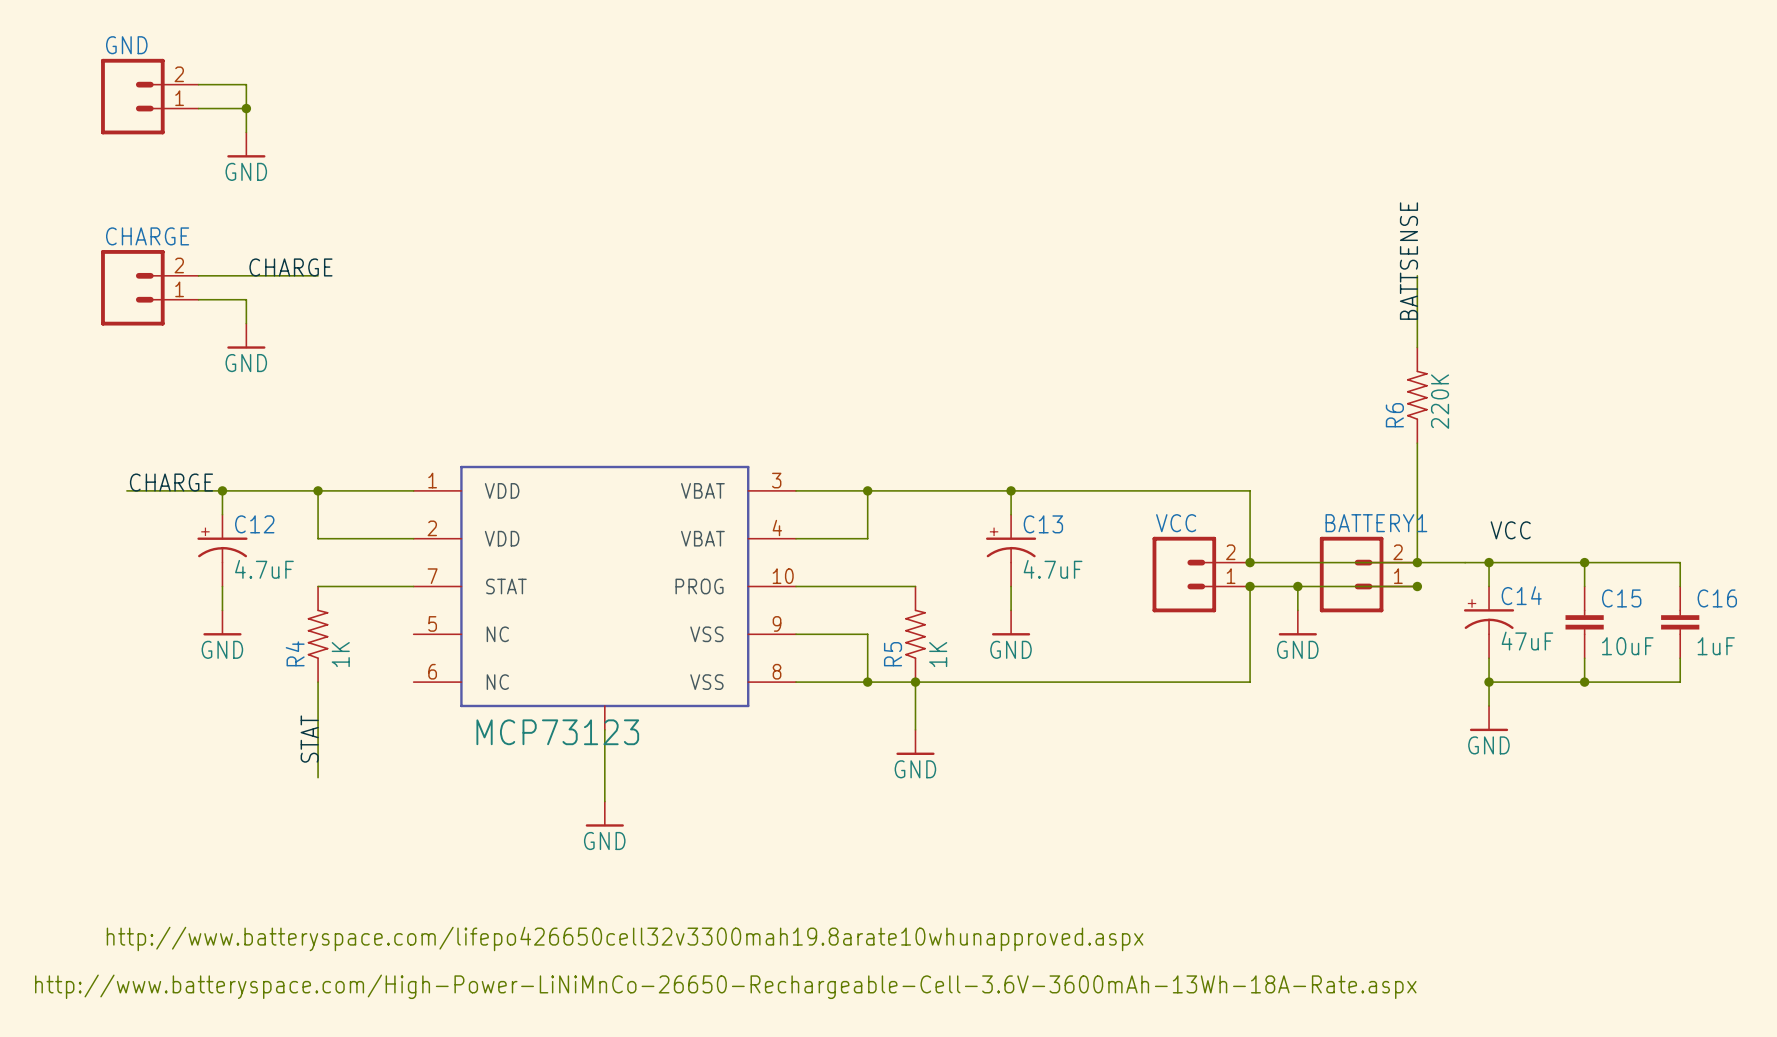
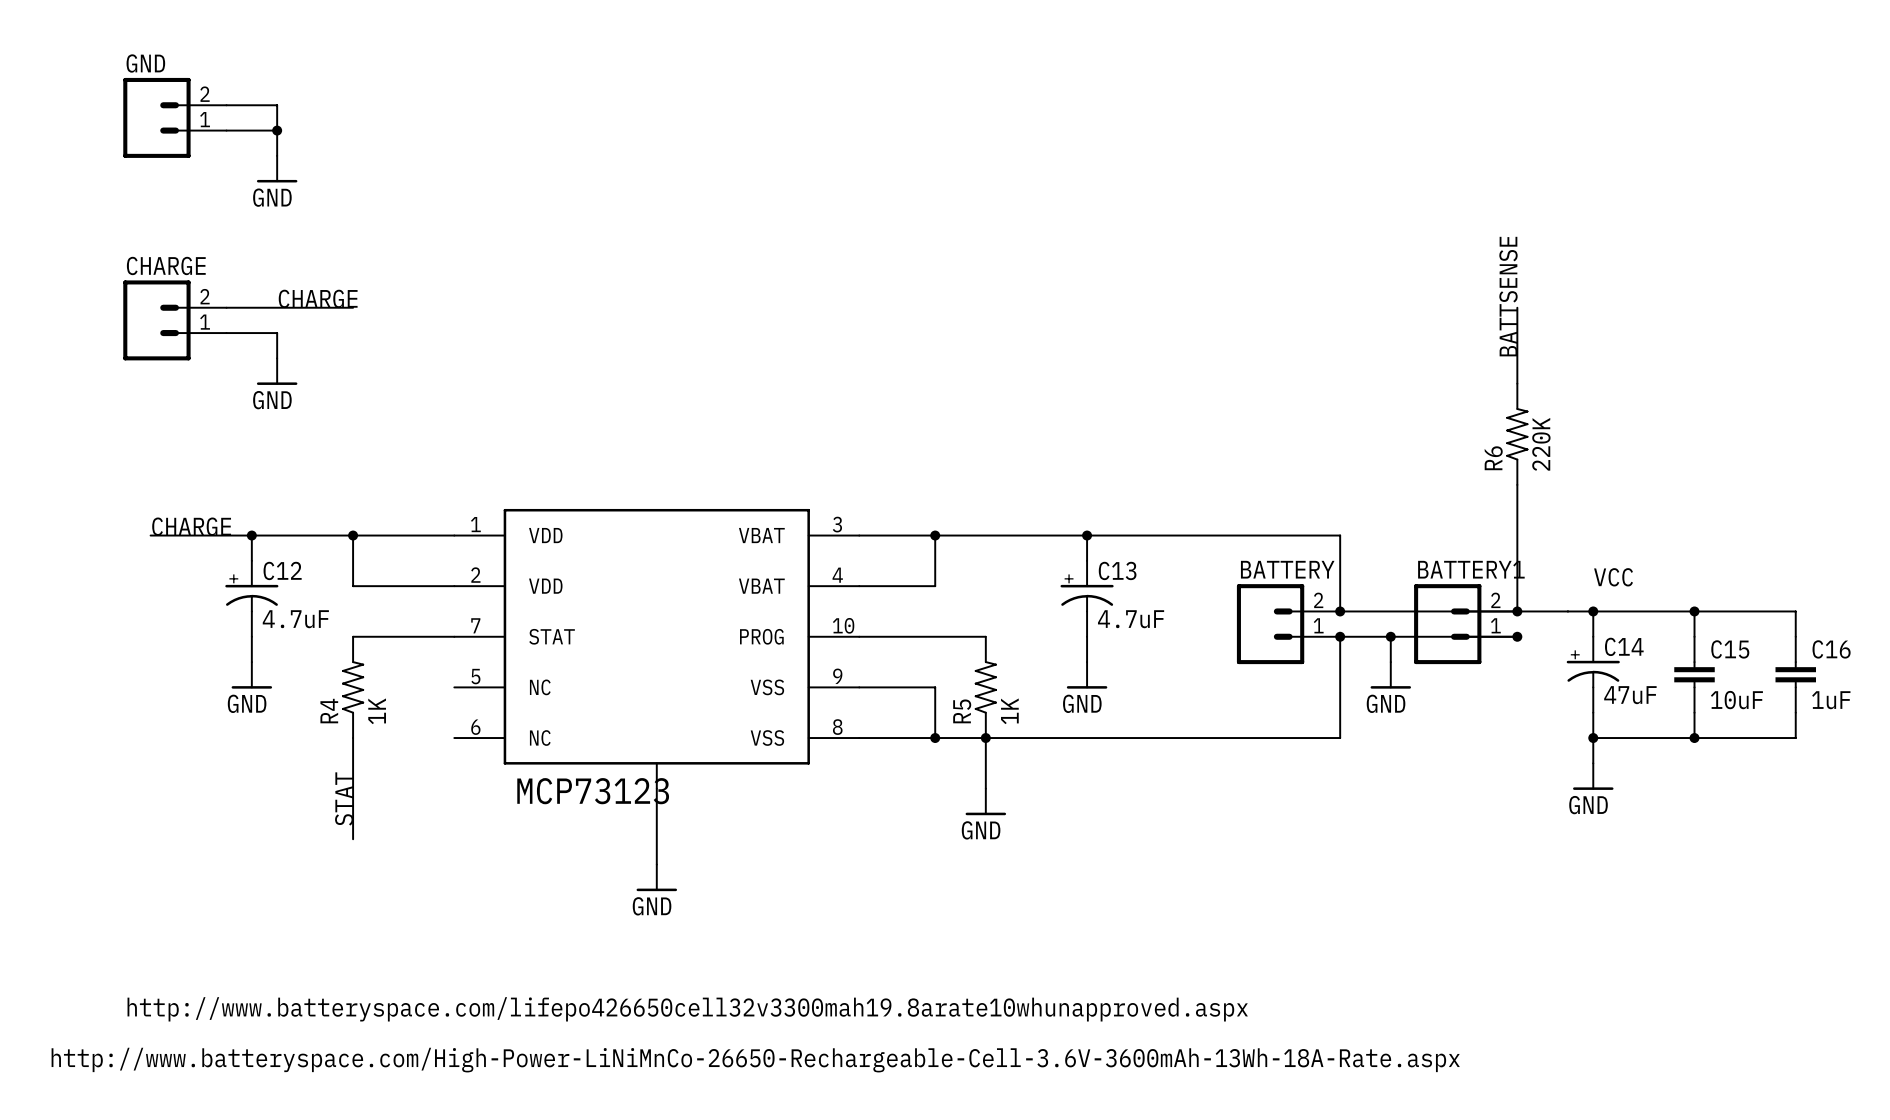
VCC name: VCC (1176, 523) -> BATTERY (1287, 569)

